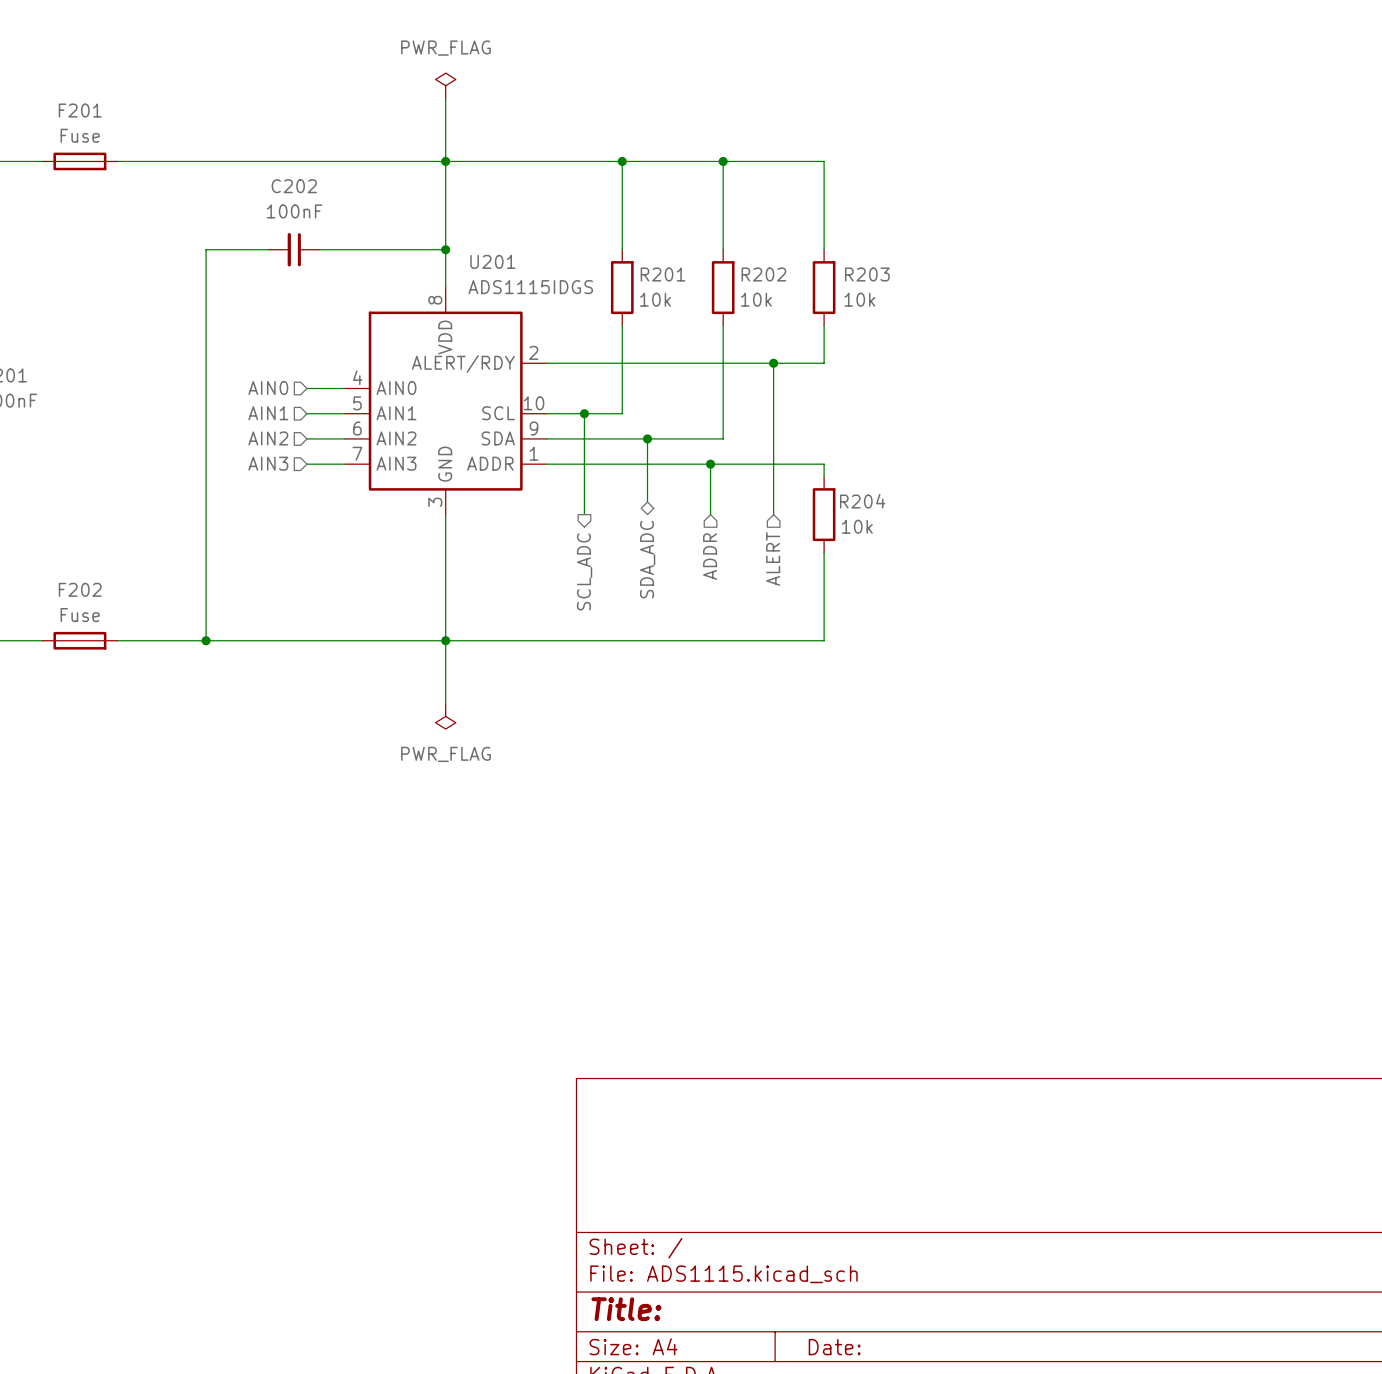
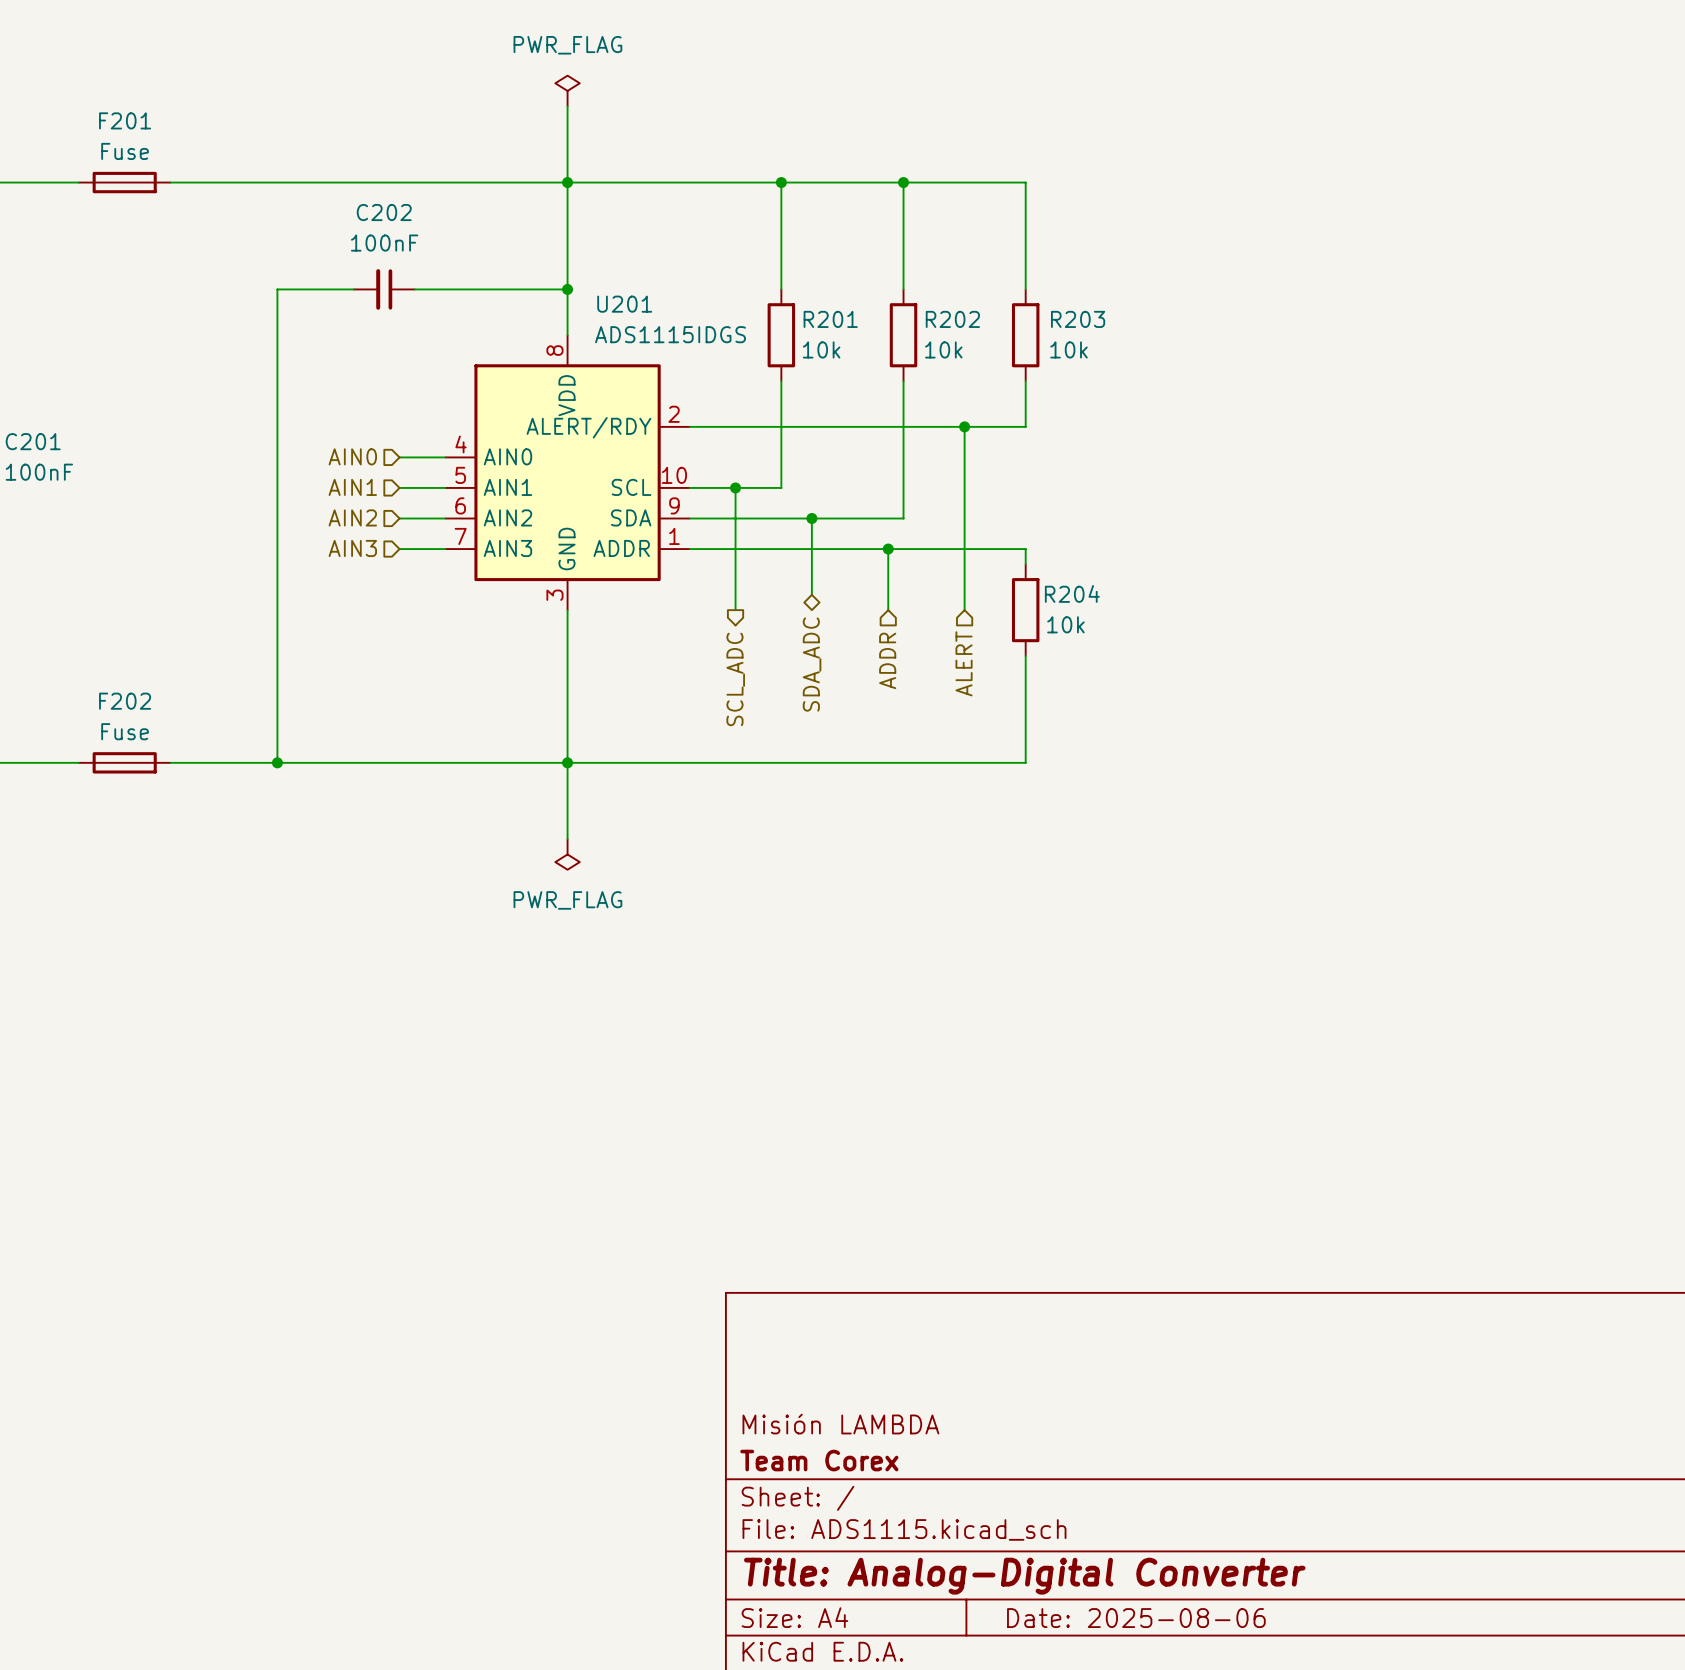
title block: none -> Misión LAMBDA (840, 1424)
title block: none -> Team Corex (819, 1460)
title block: Title: (626, 1309) -> Title: Analog-Digital Converter (1024, 1576)
title block: Date: (834, 1347) -> Date: 2025-08-06 (1136, 1618)

